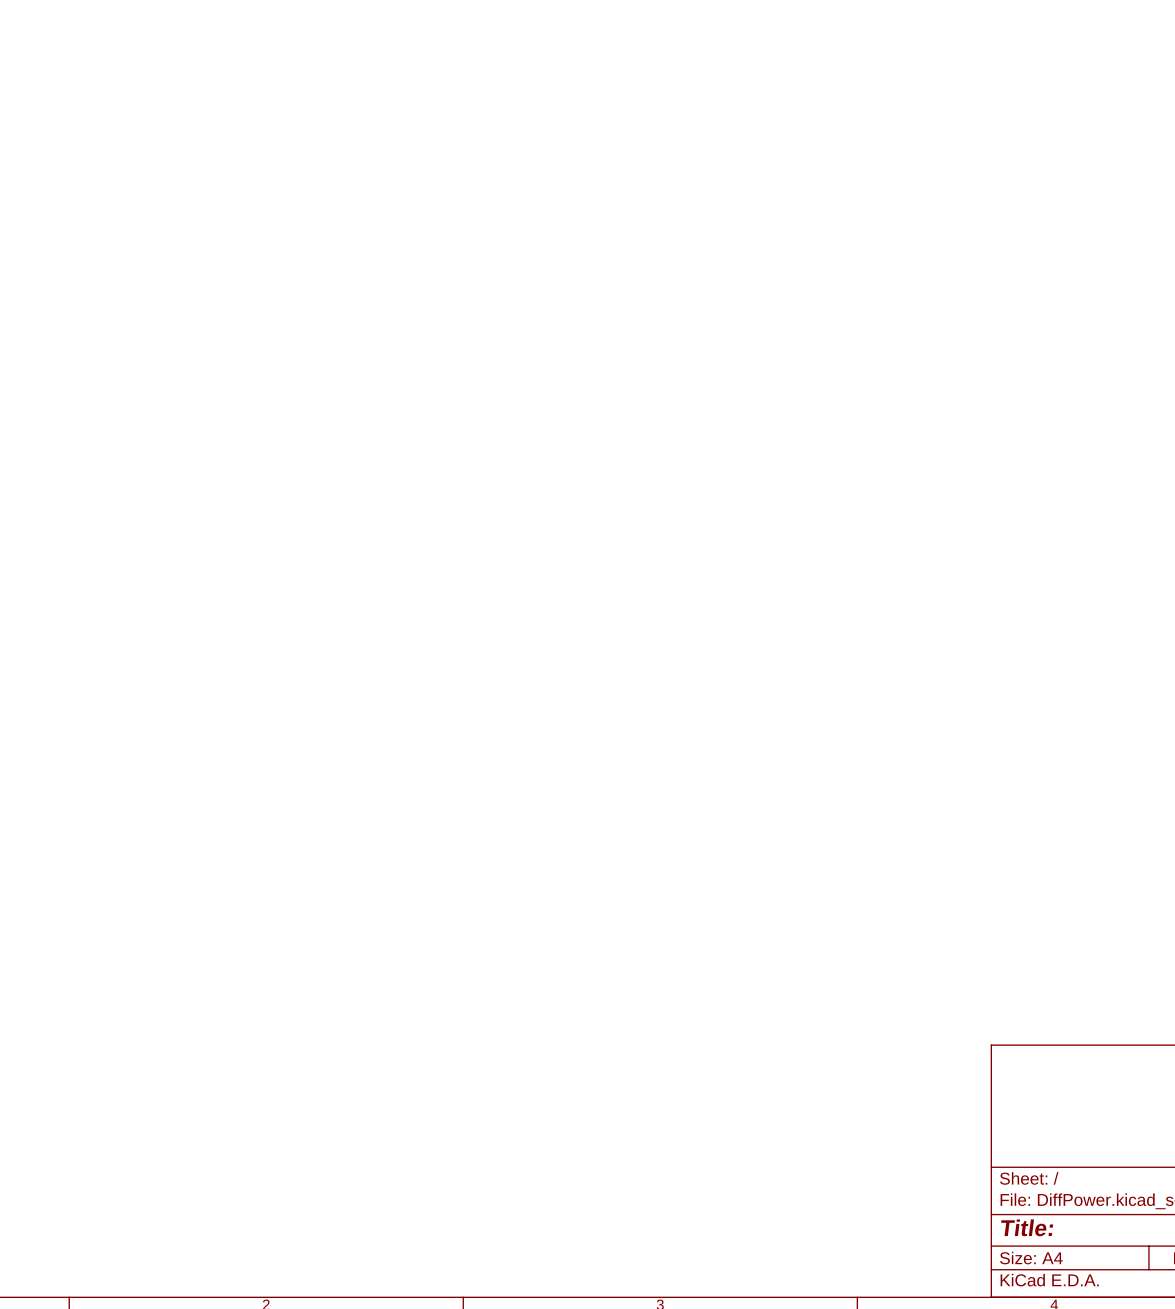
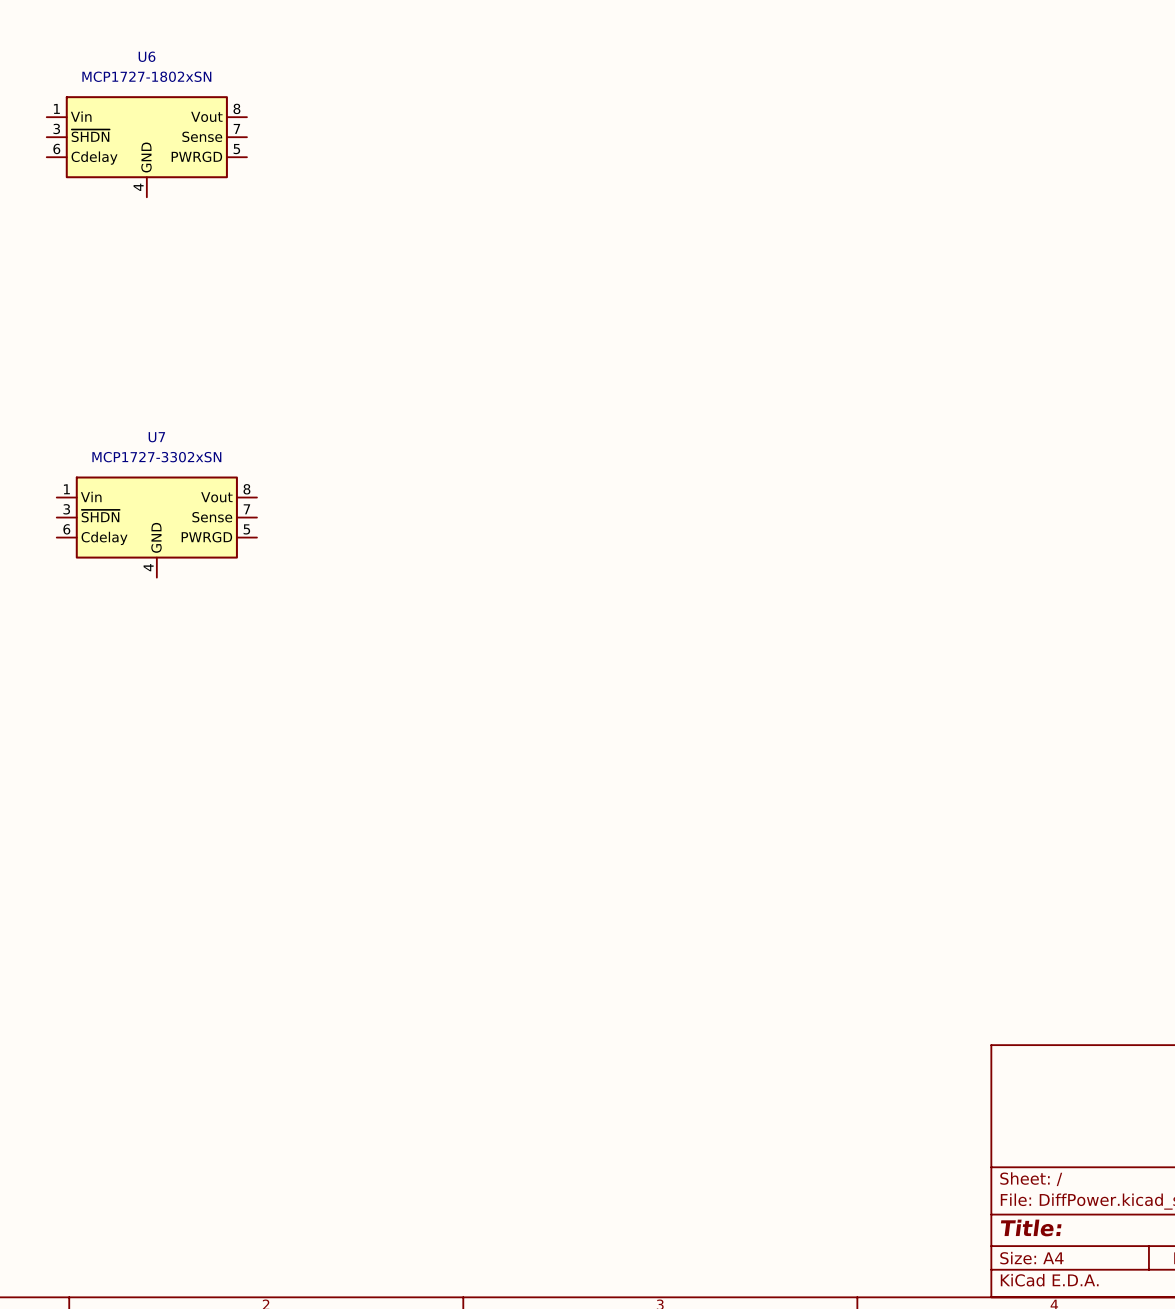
U6: none -> MCP1727-1802xSN (146, 146)
U7: none -> MCP1727-3302xSN (156, 527)

